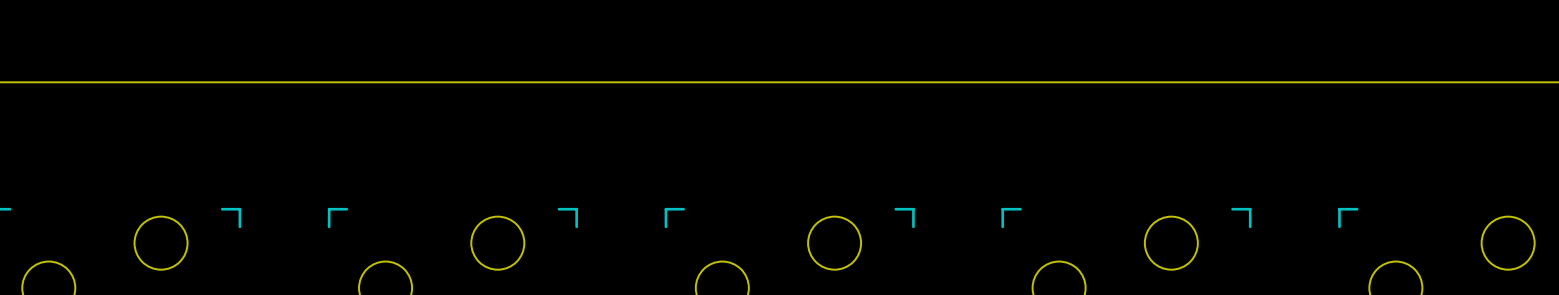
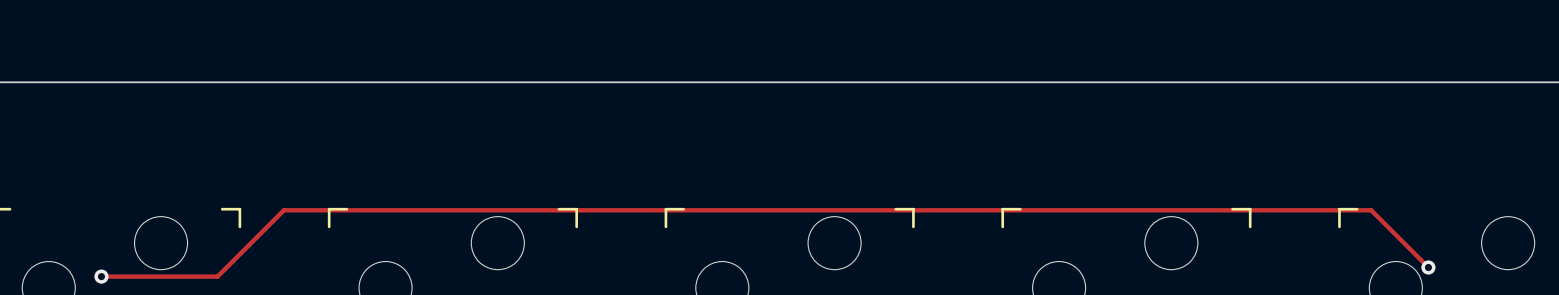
track: none -> (1428, 267) (1371, 210) (283, 210) (217, 276) (101, 276)
via: none -> (1428, 267)
via: none -> (101, 276)

